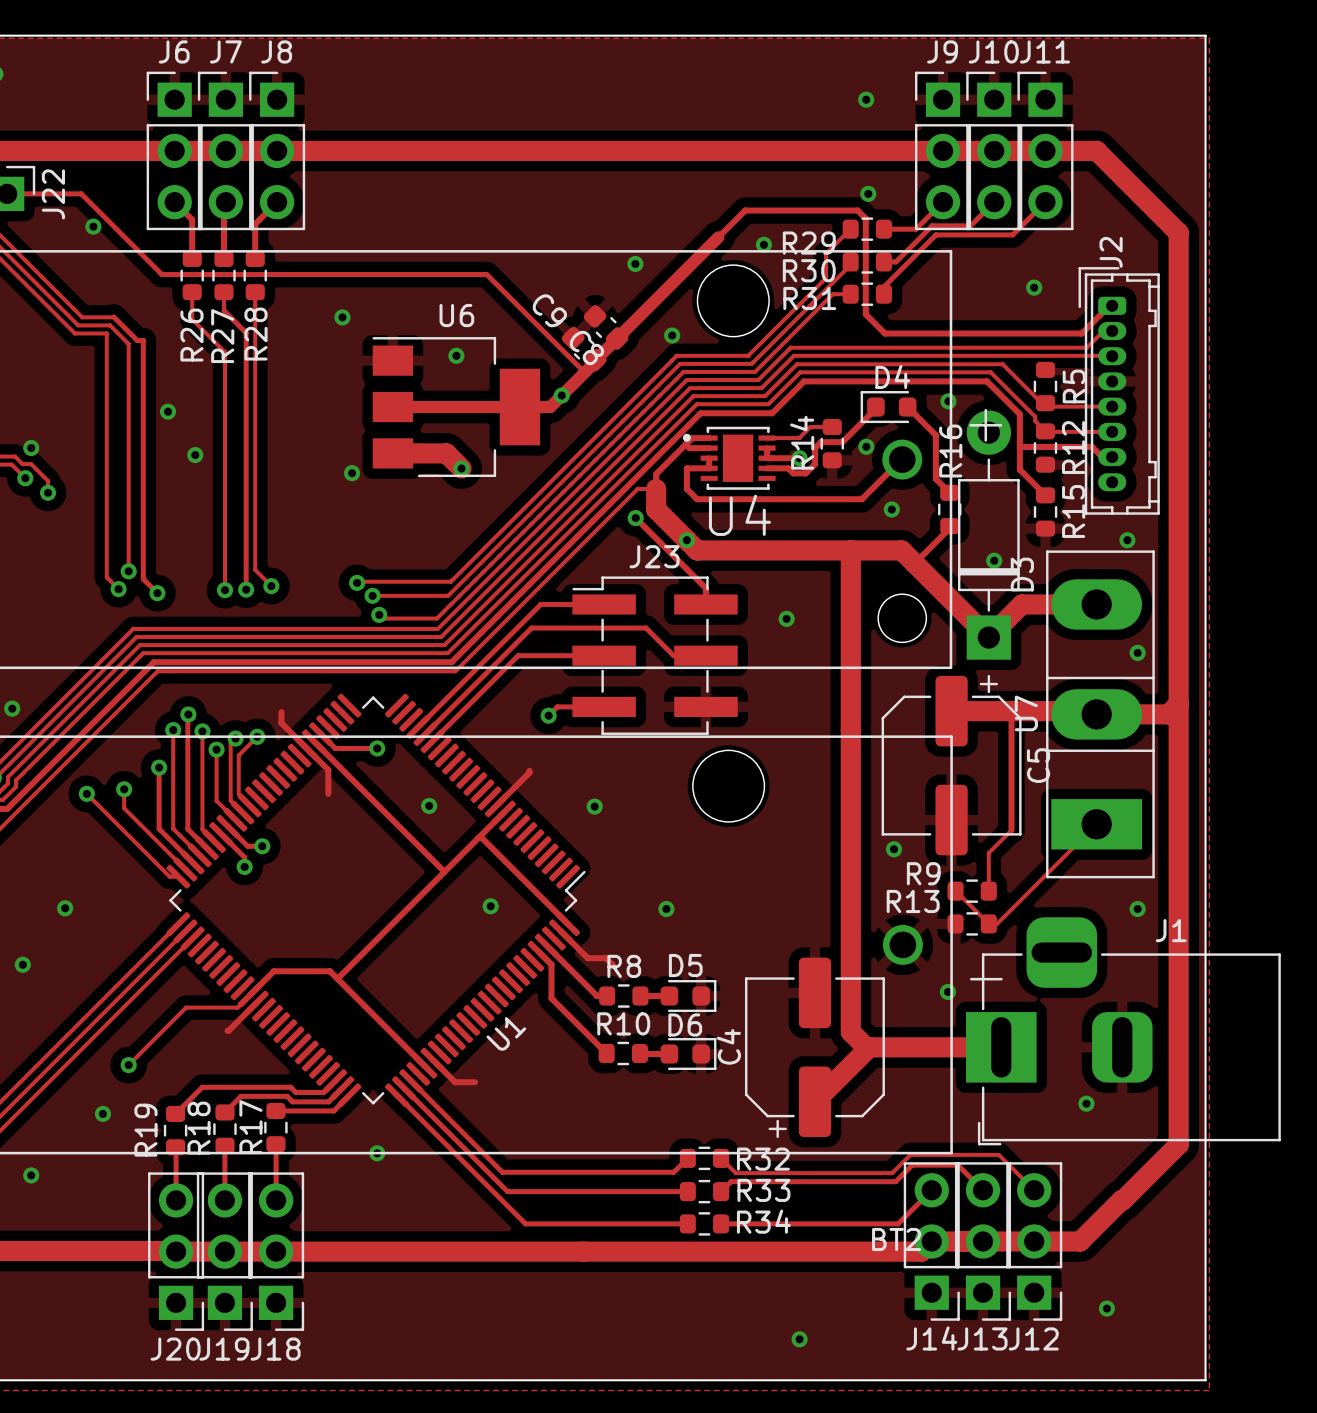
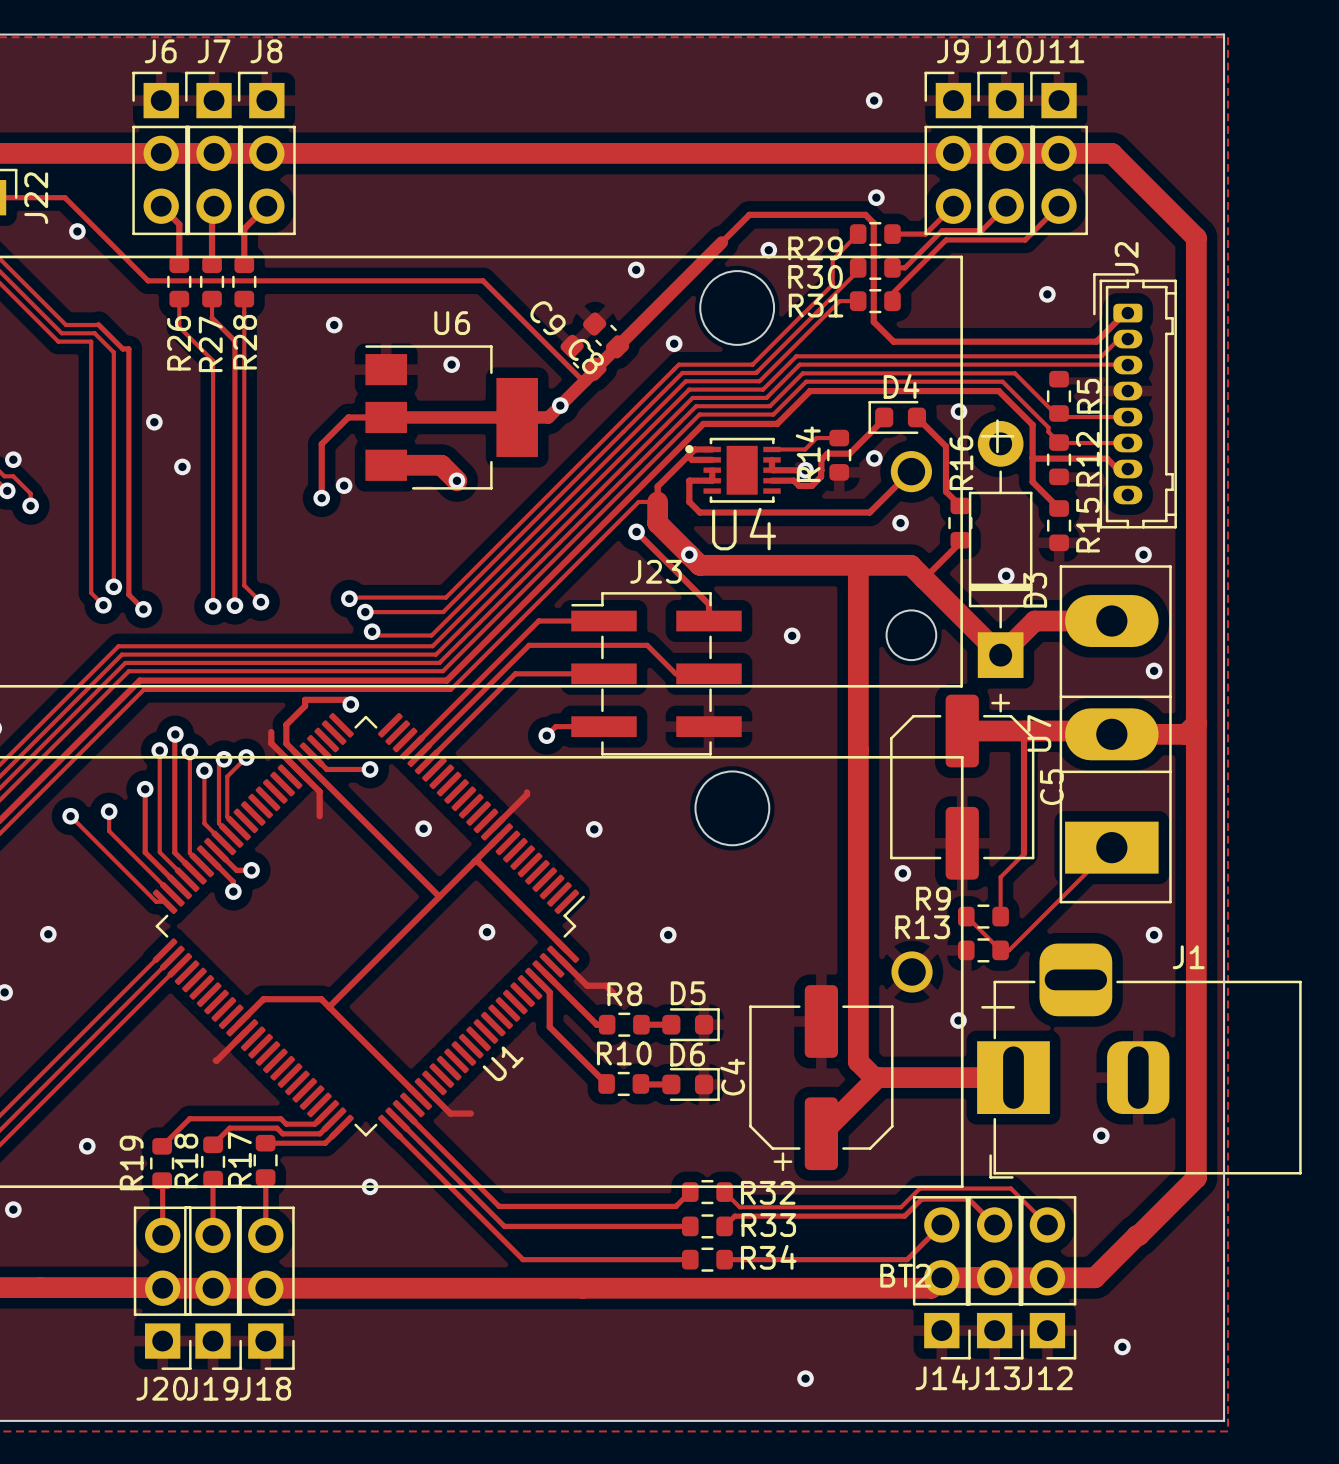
track: none -> (386, 417) (348, 417) (321, 444) (321, 498)
via: none -> (321, 498)
track: none -> (350, 704) (346, 699) (305, 699) (305, 706) (286, 724) (286, 743) (304, 762)
via: none -> (350, 704)
track: (249, 995) (237, 1007) (186, 1007) (128, 1065) -> none
via: (128, 1065) -> none

